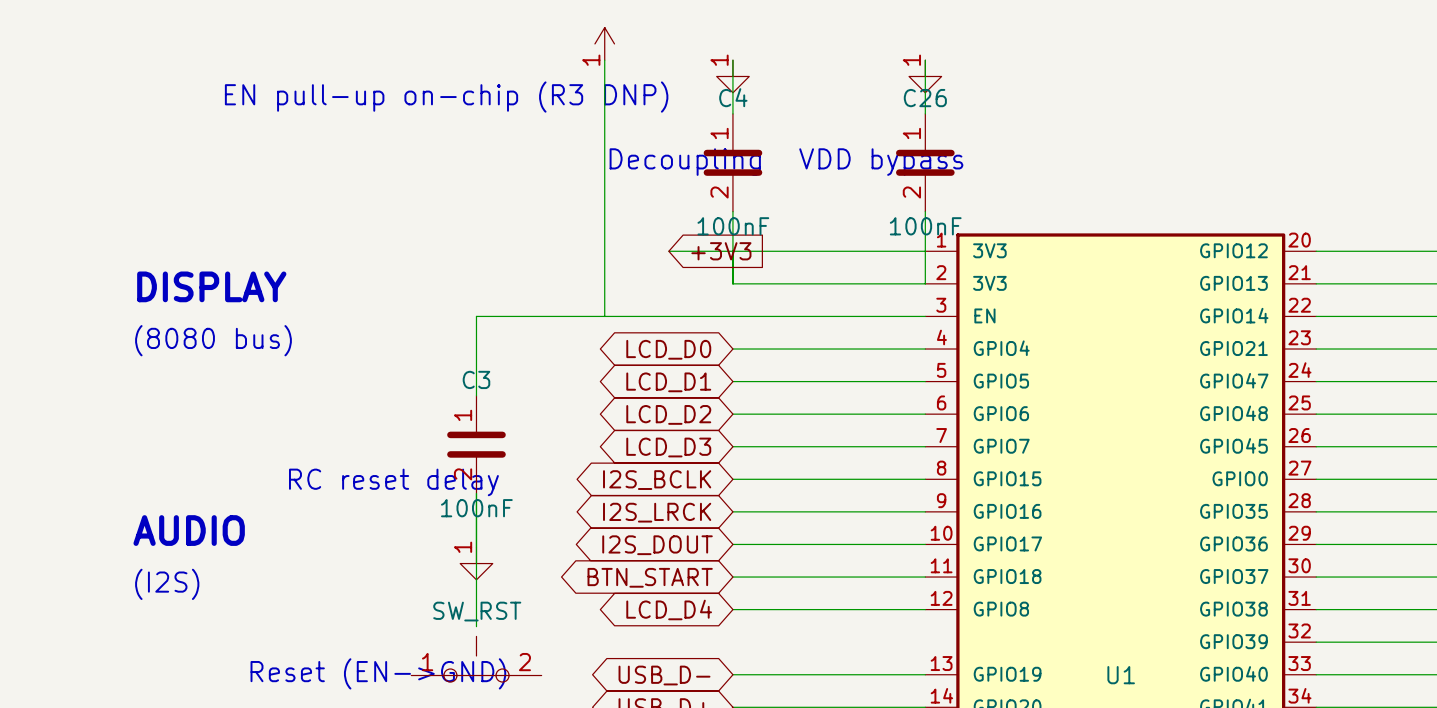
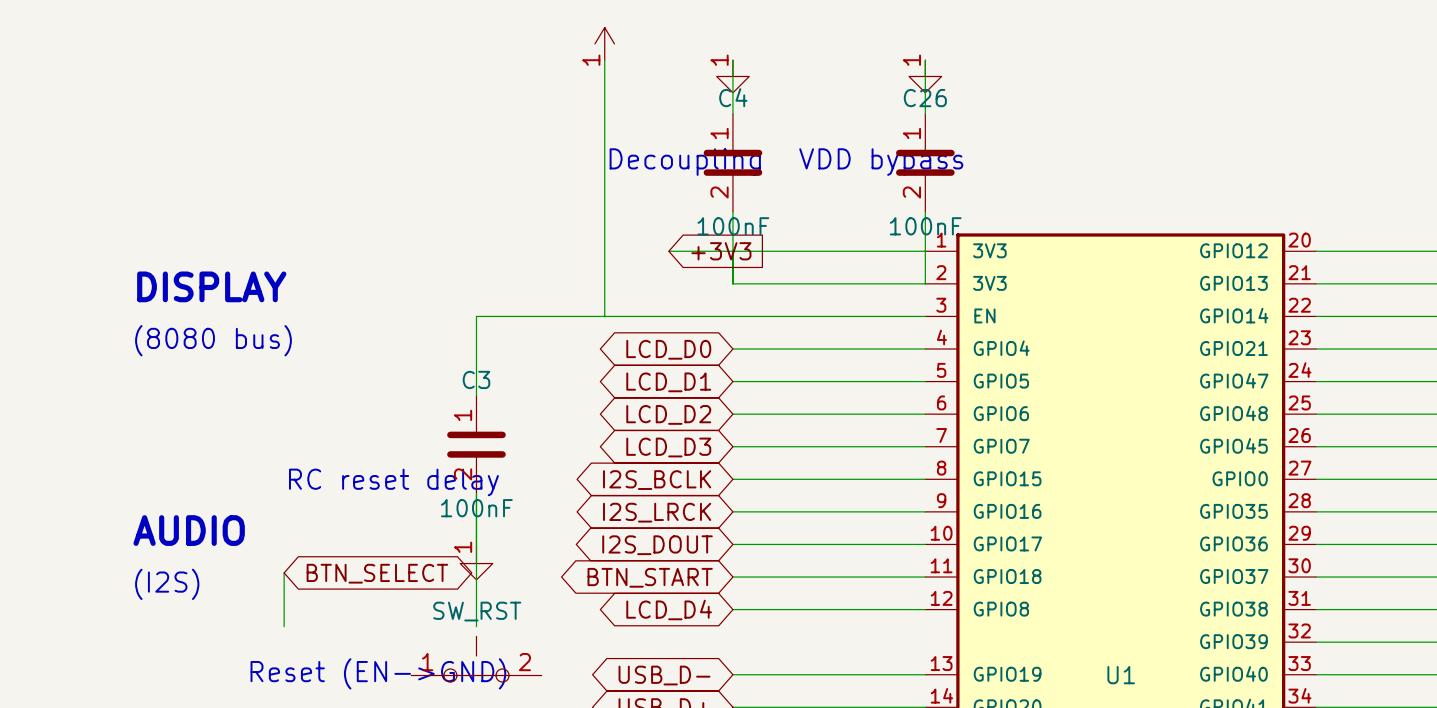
text: EN pull-up on-chip (R3 DNP) (446, 97) -> none
wire: none -> (284, 572) (284, 626)
global label: none -> BTN_SELECT (377, 573)

